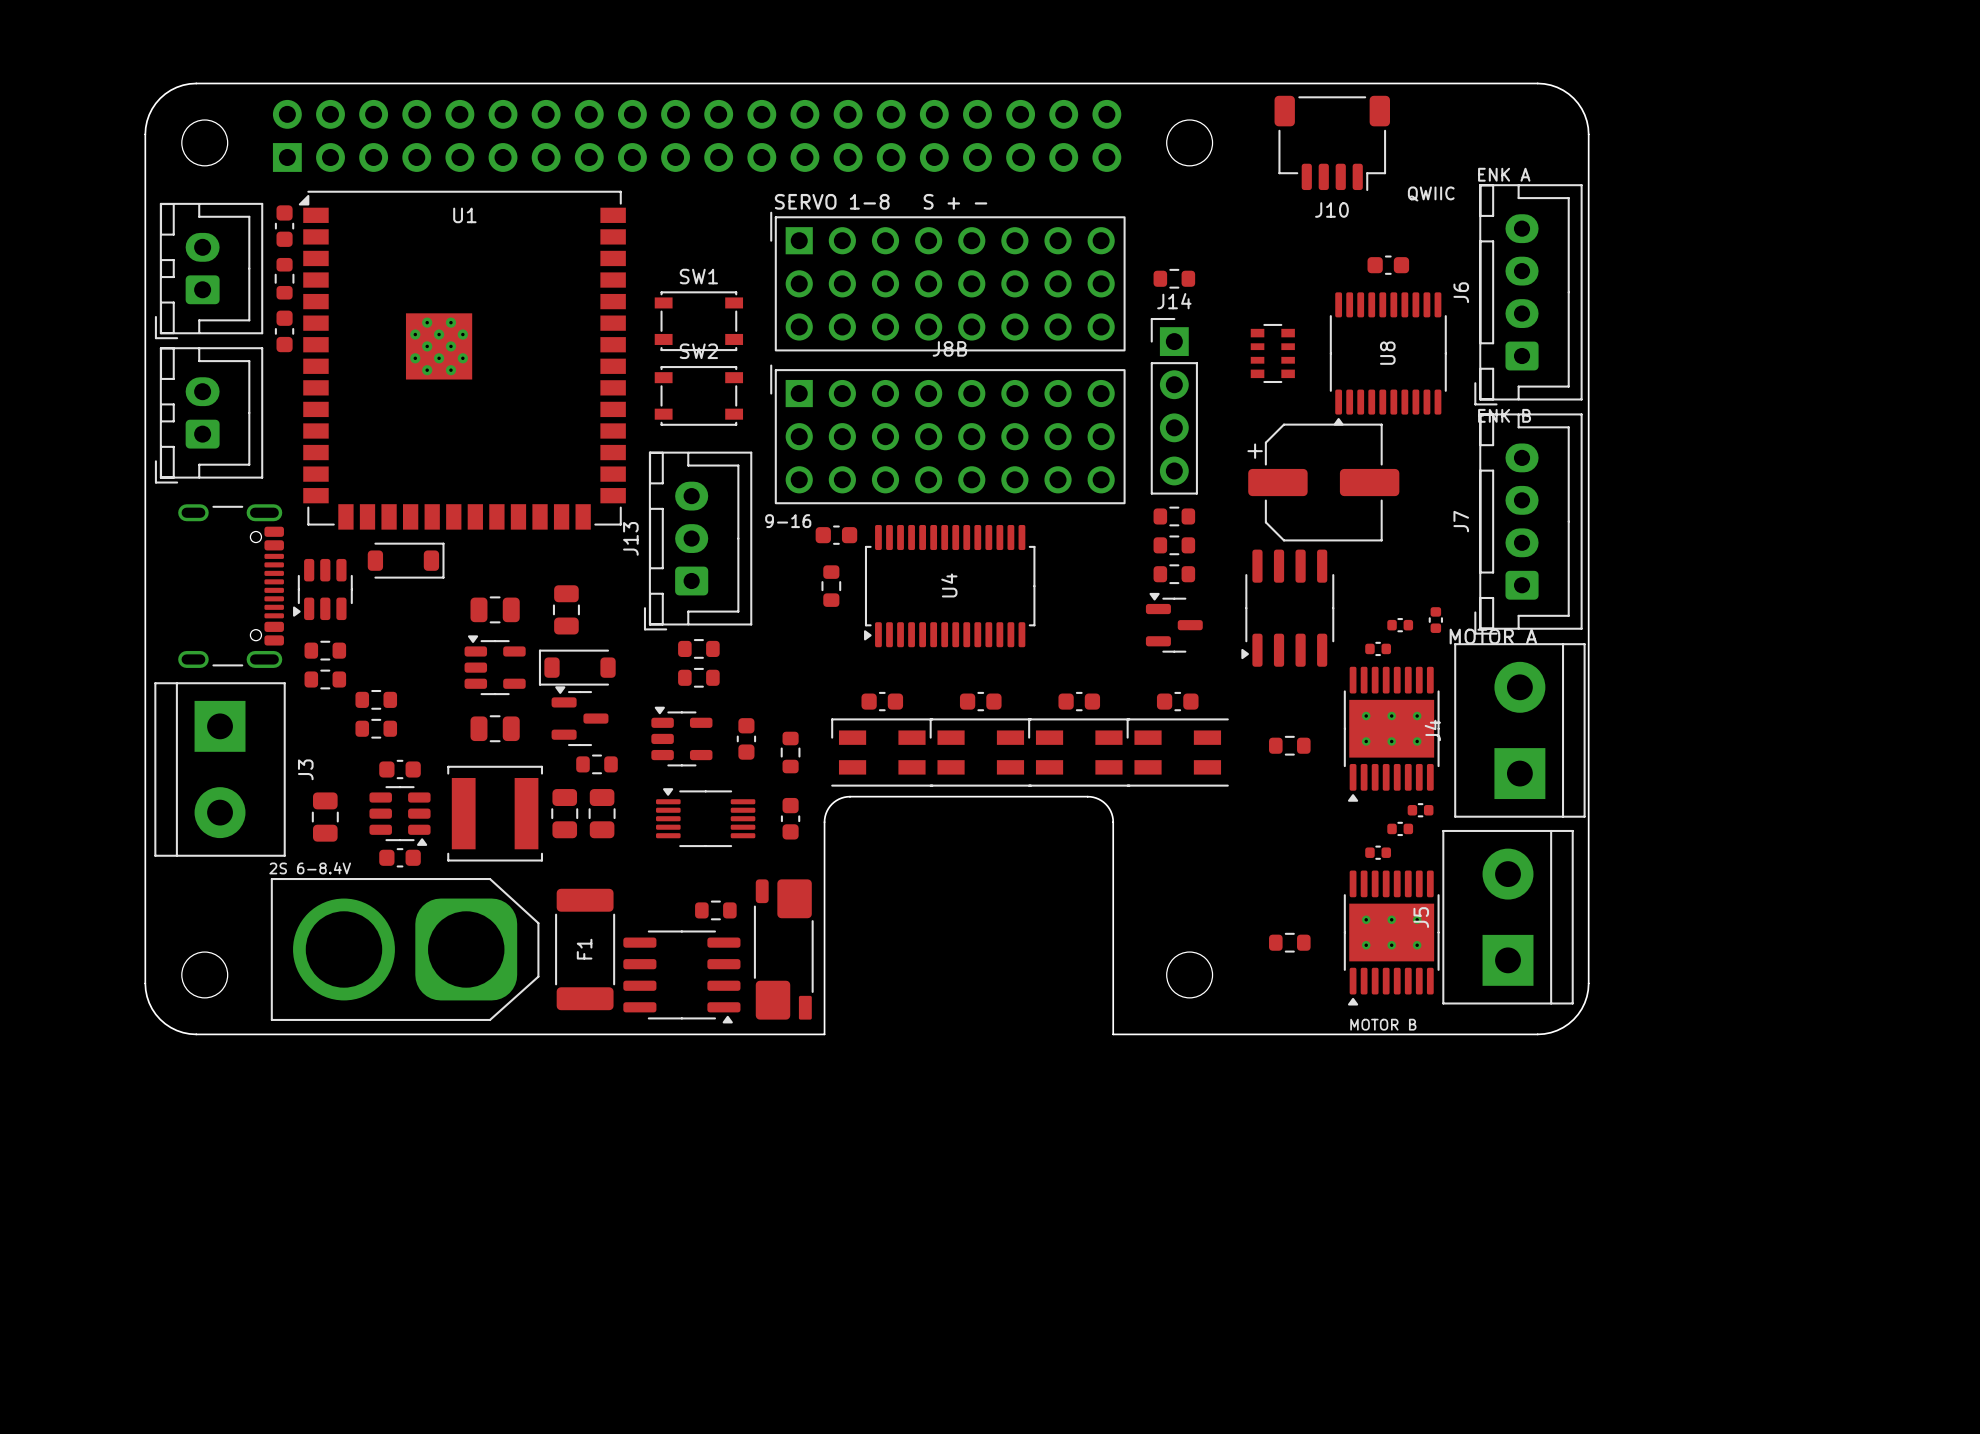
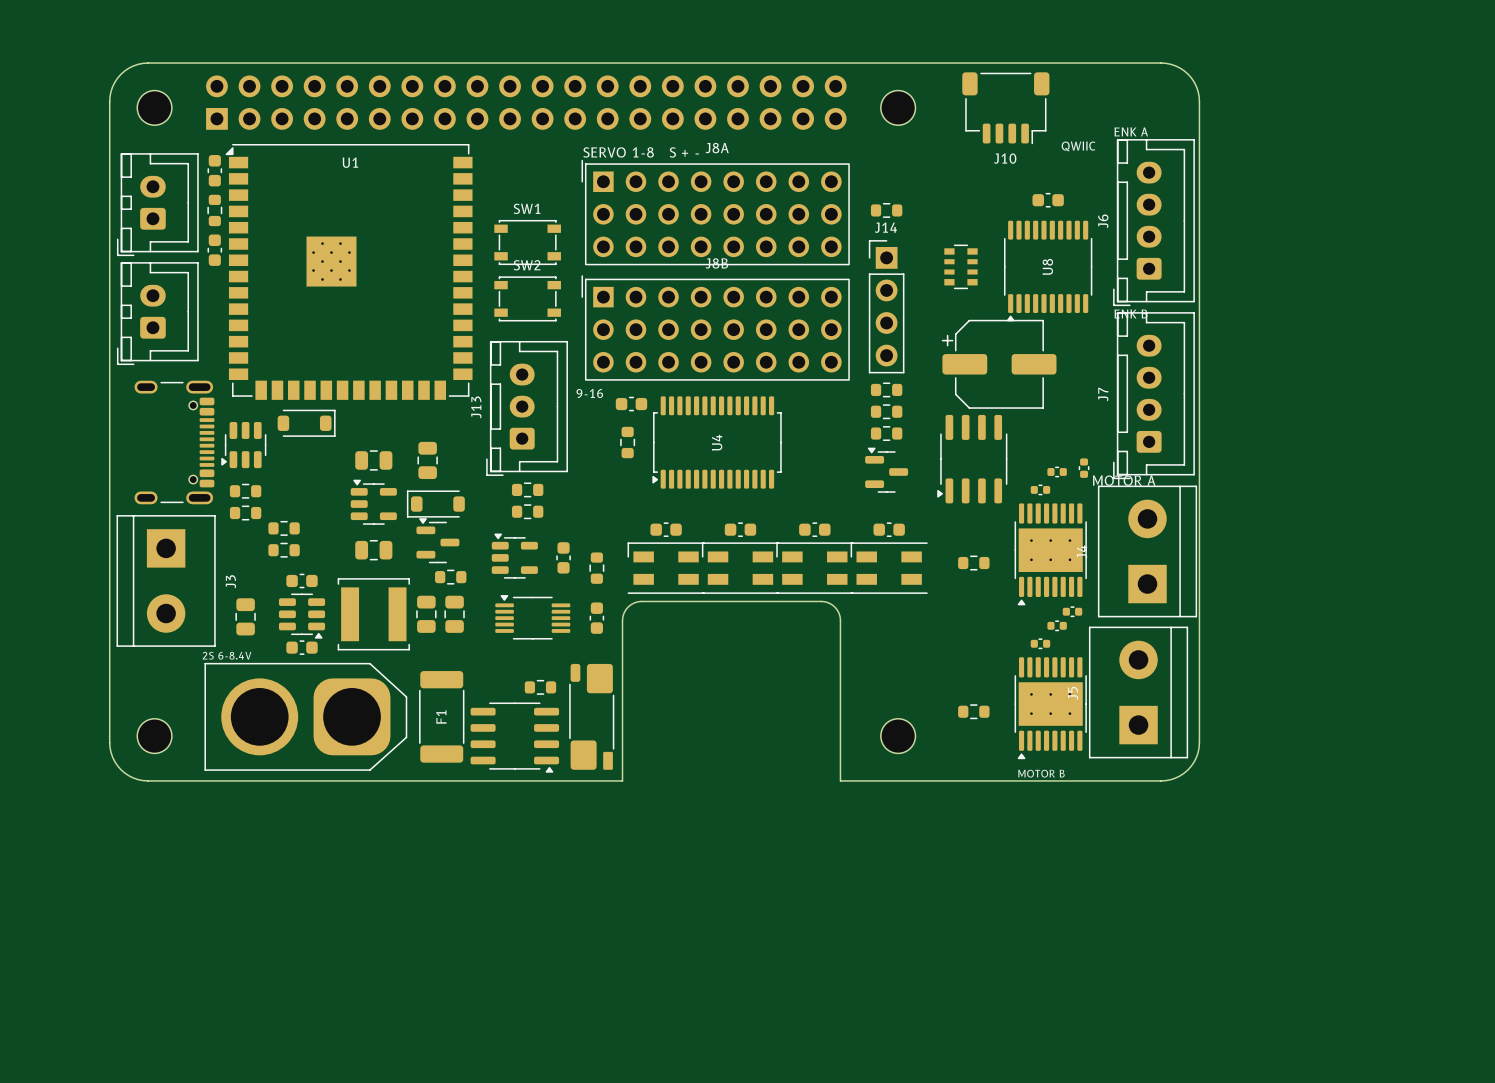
J8A name: none -> J8A (717, 148)

